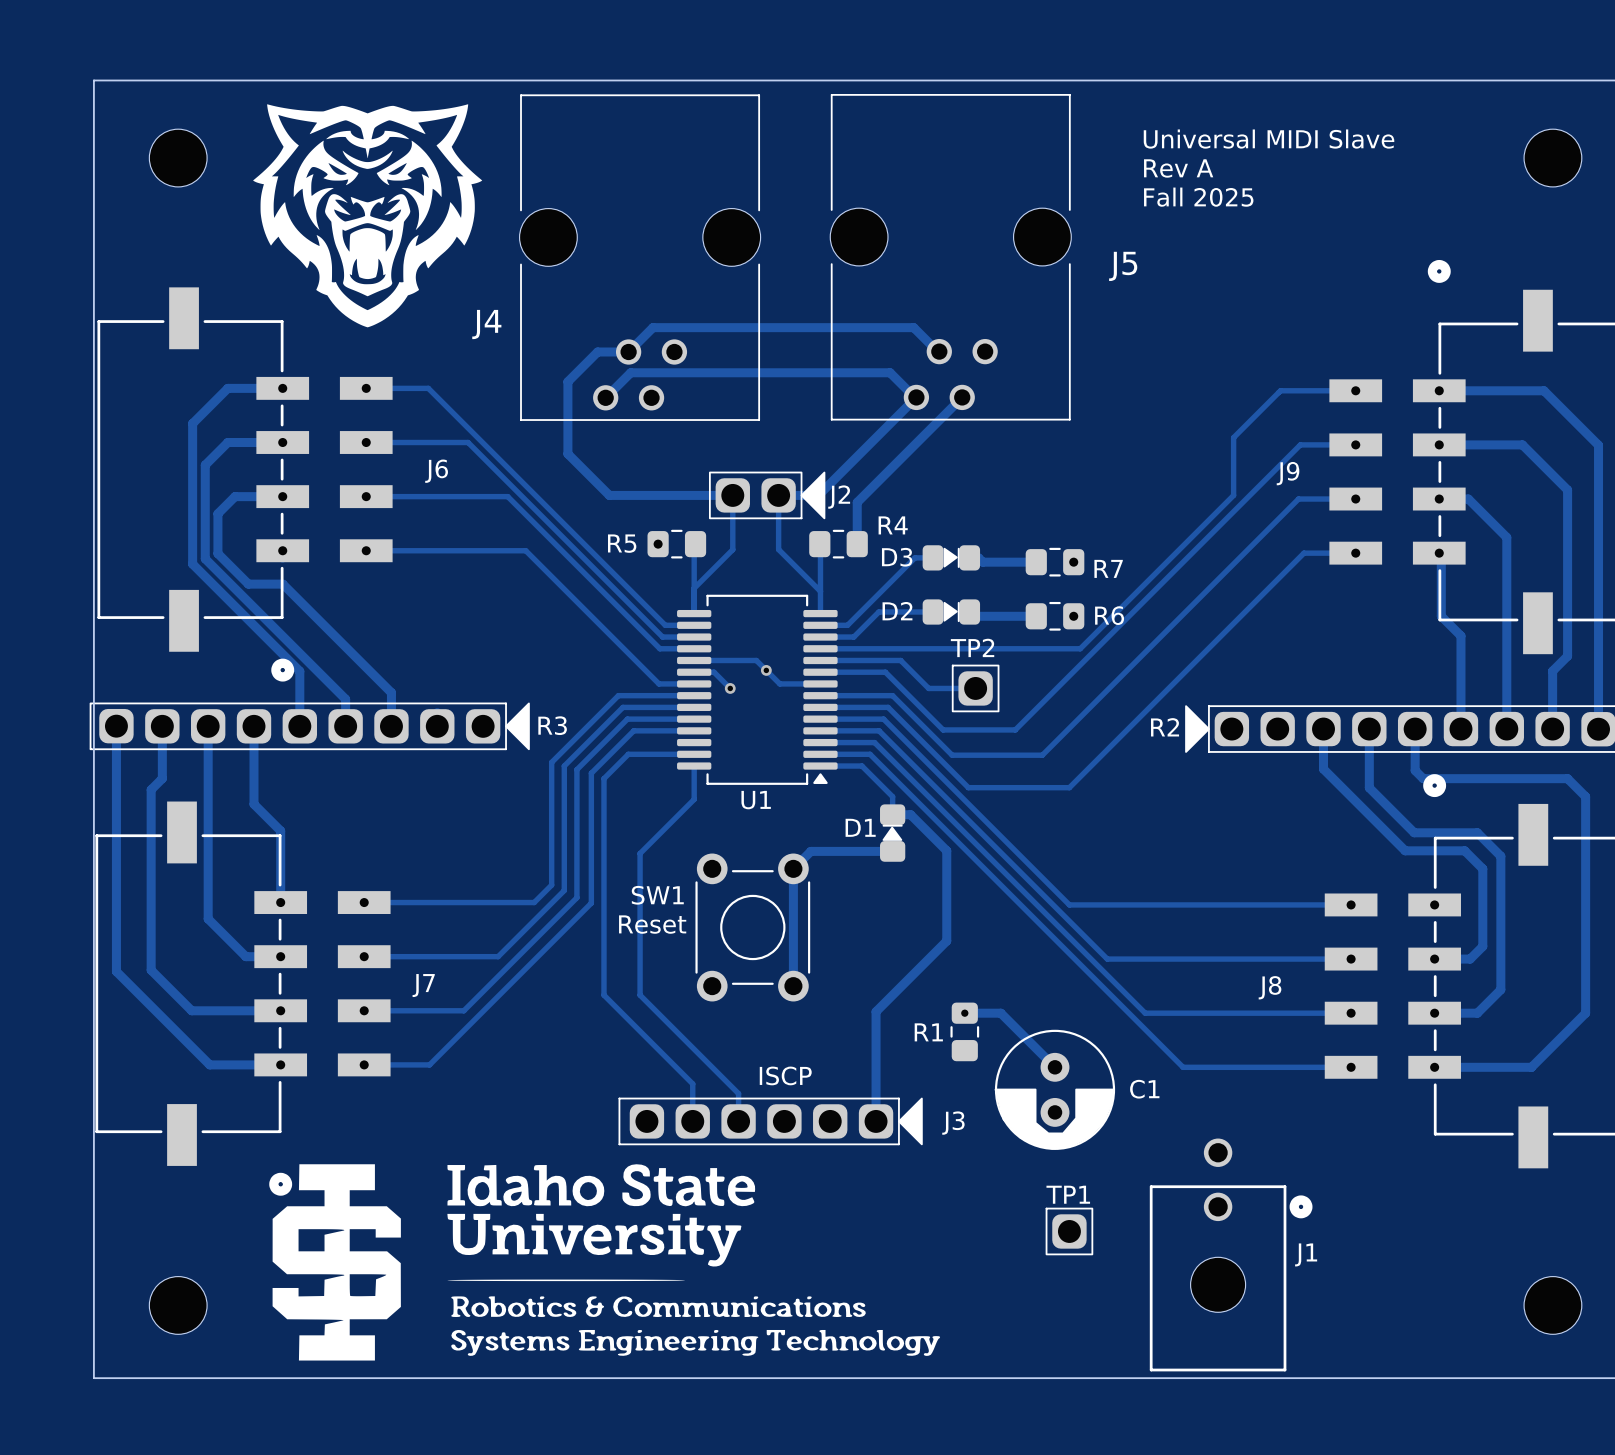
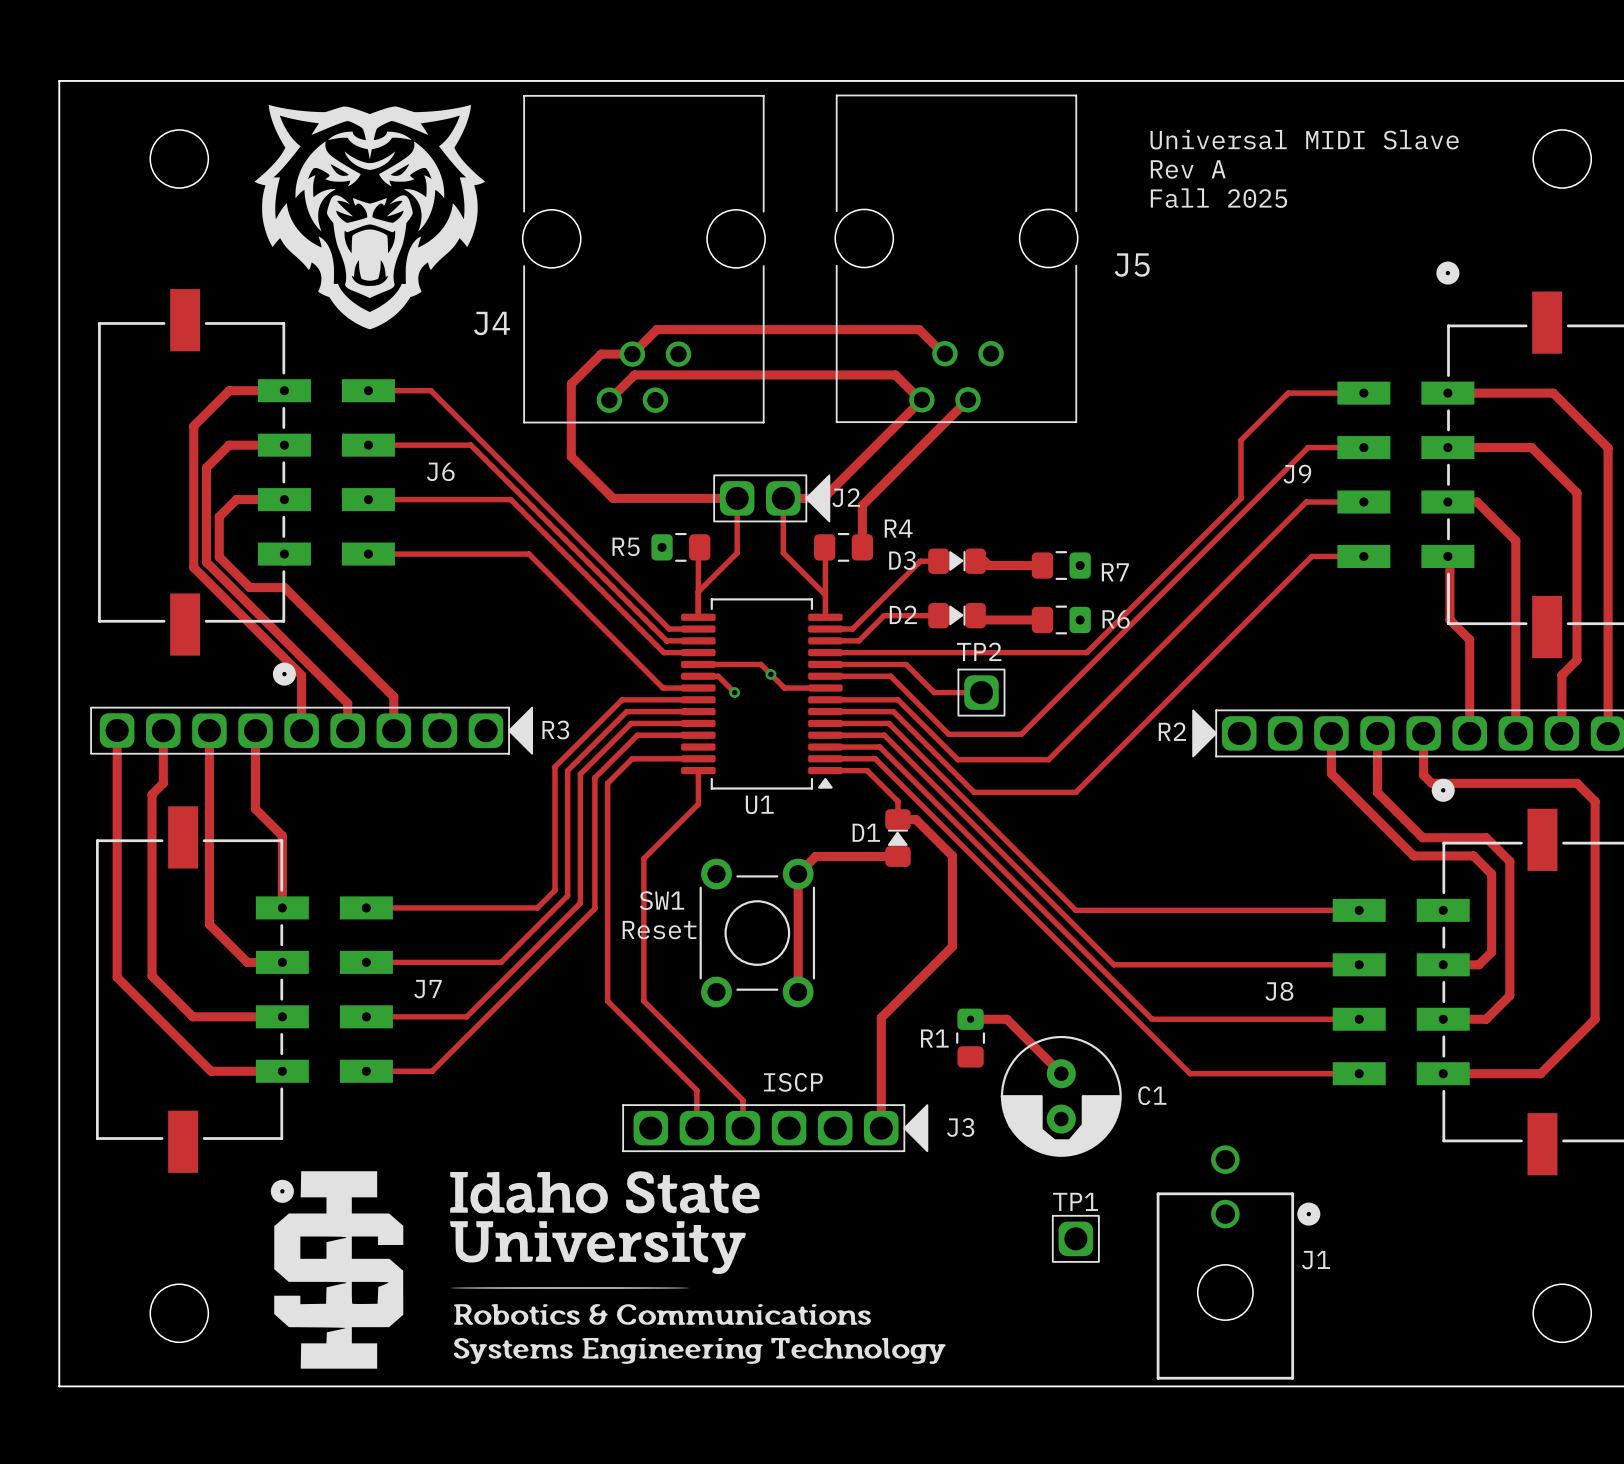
board edge: (93, 80) (93, 1378) -> (94, 80) (59, 80) (59, 1386) (94, 1386)

